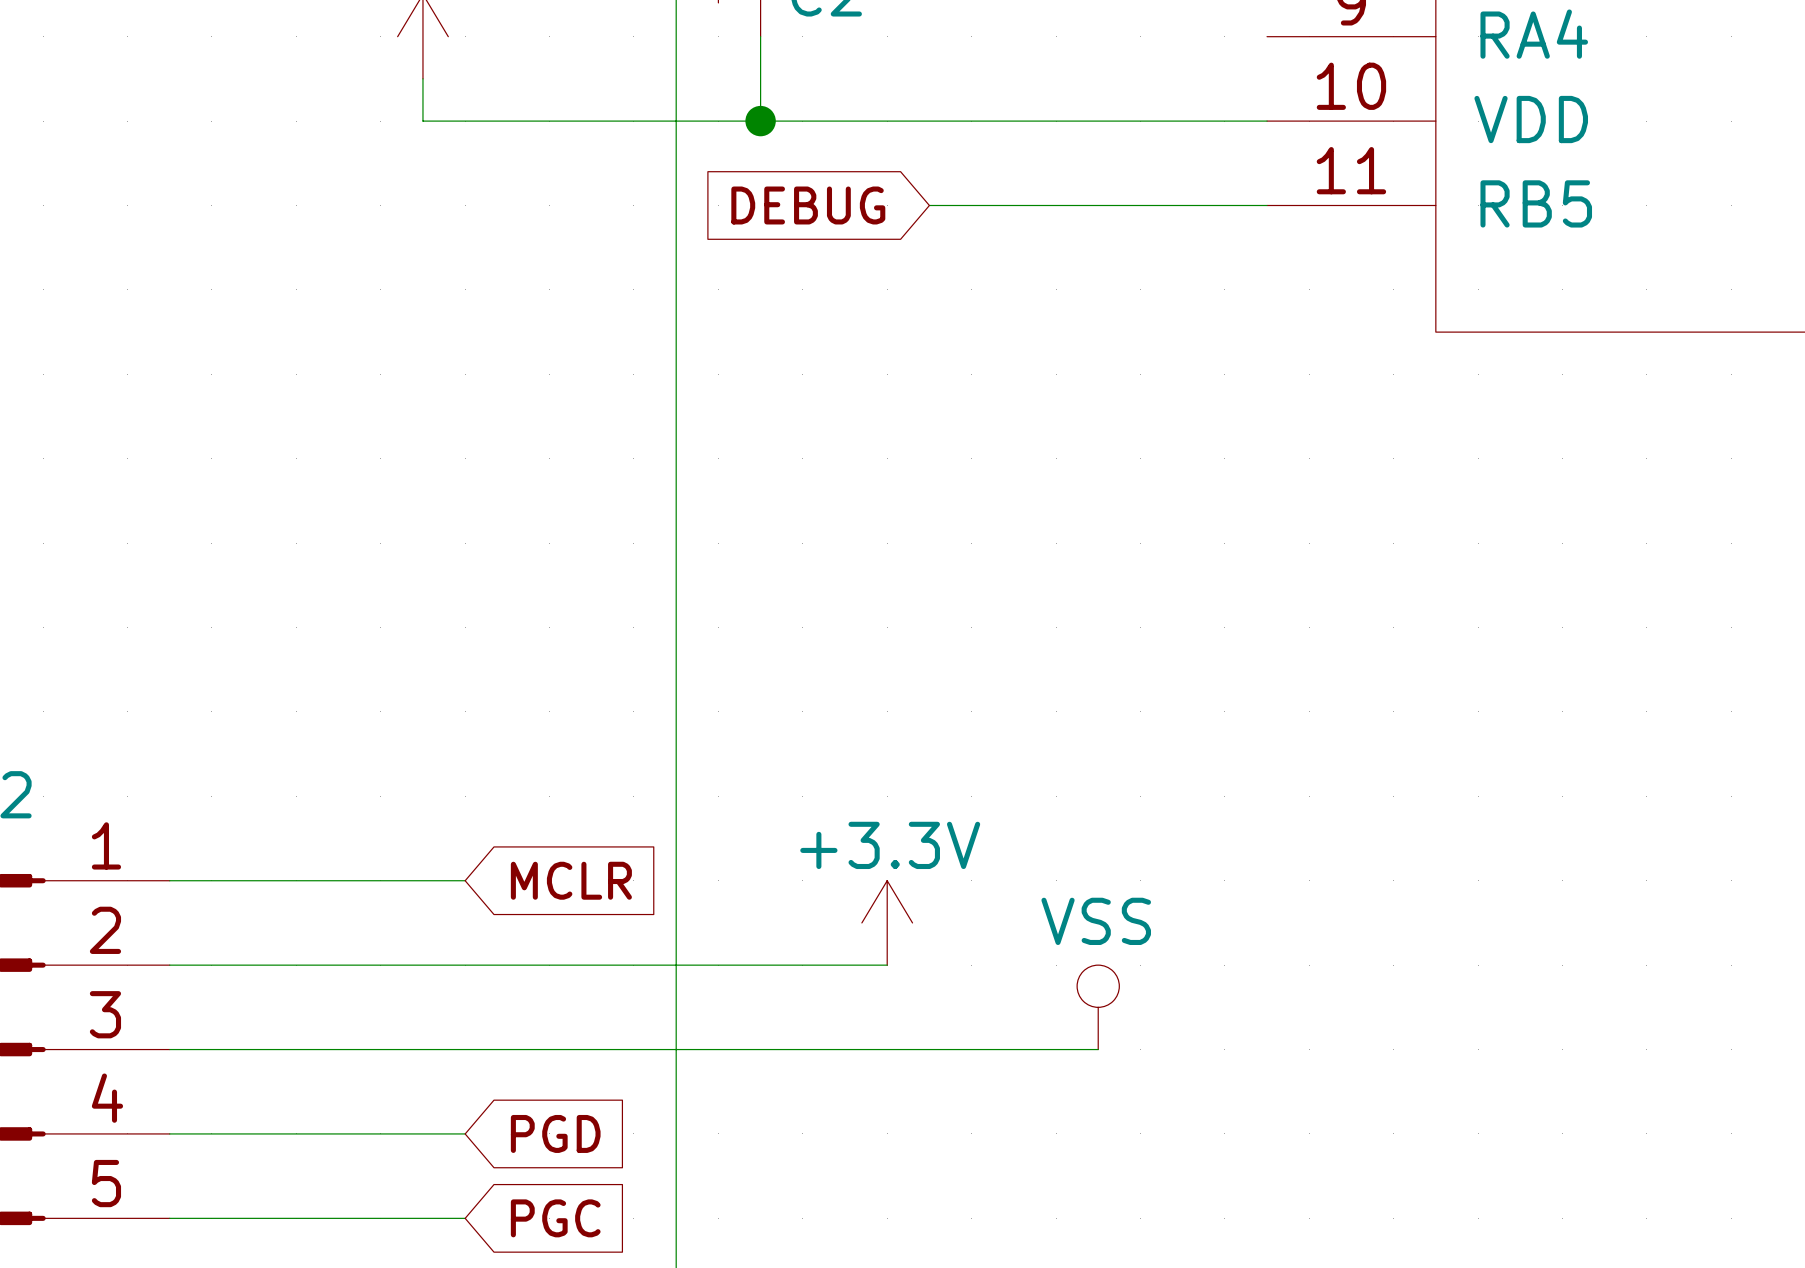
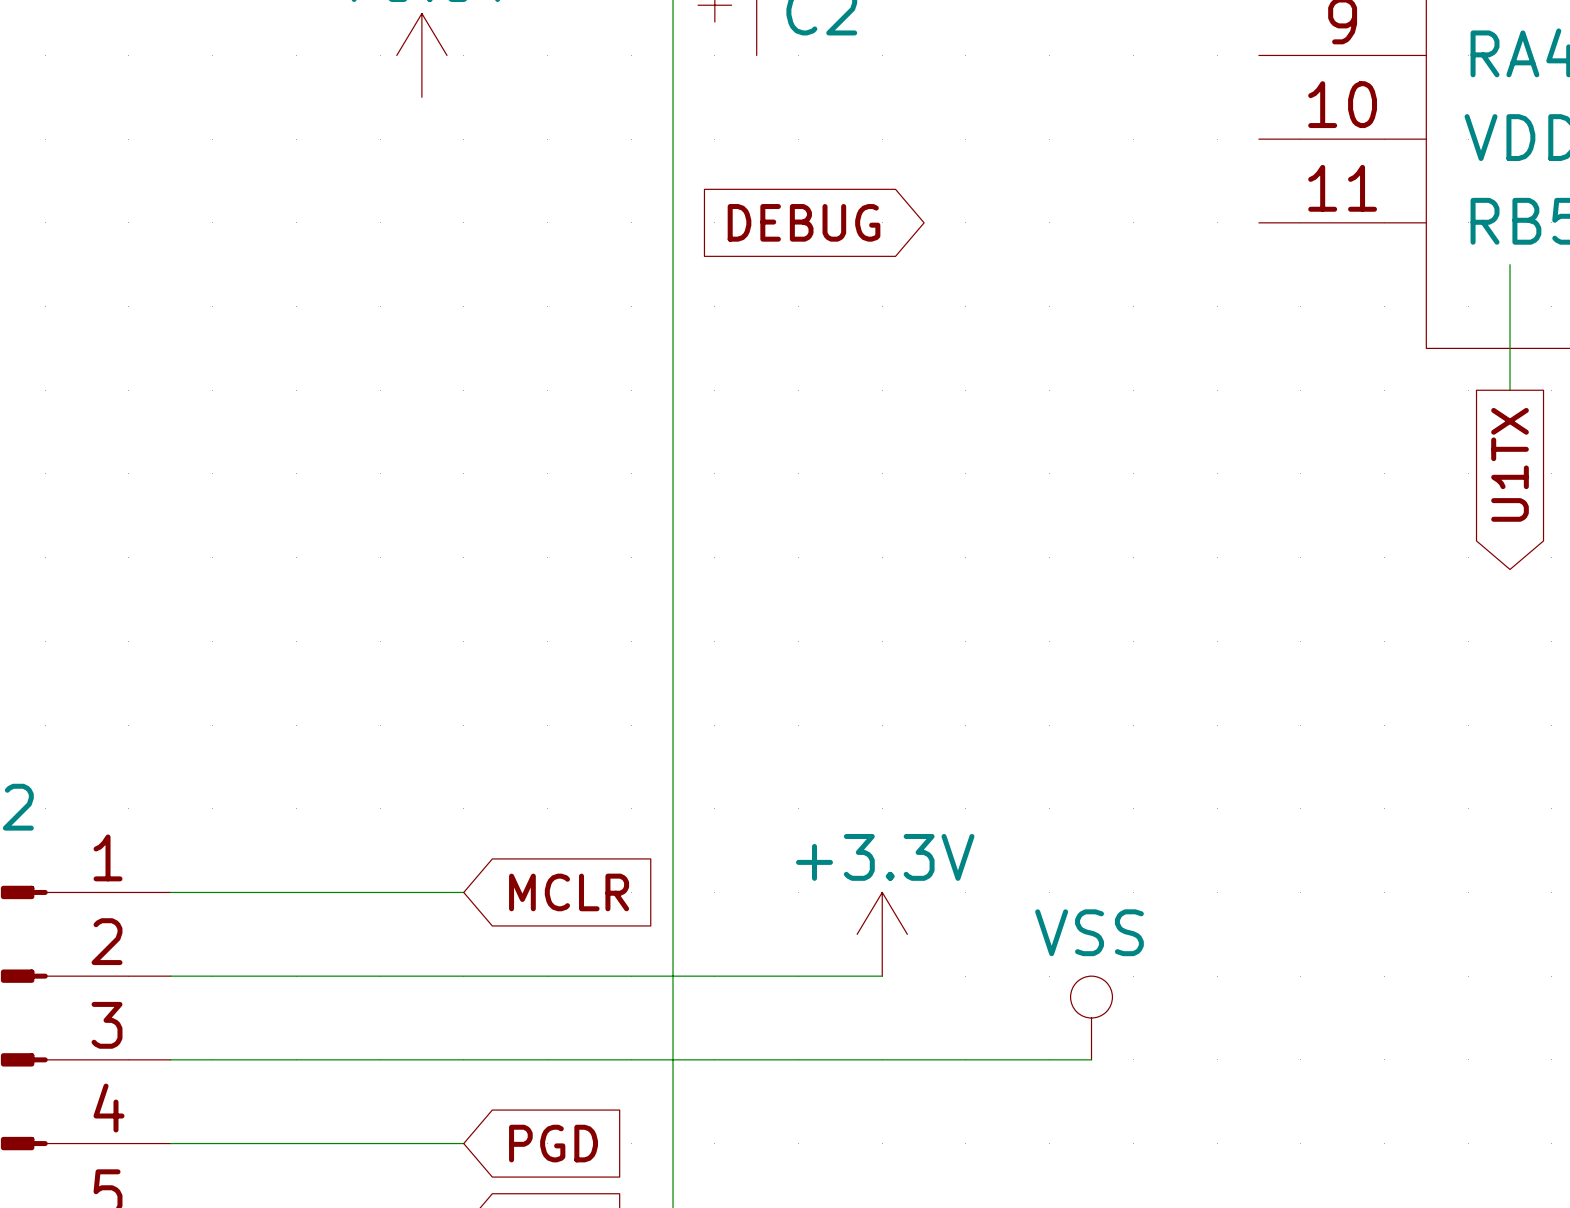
wire: (760, 36) (760, 121) -> none
wire: (422, 78) (422, 121) (1267, 121) -> none
junction: (760, 121) -> none
wire: (929, 205) (1267, 205) -> none
wire: none -> (1510, 264) (1510, 390)
global label: none -> U1TX (1510, 464)

